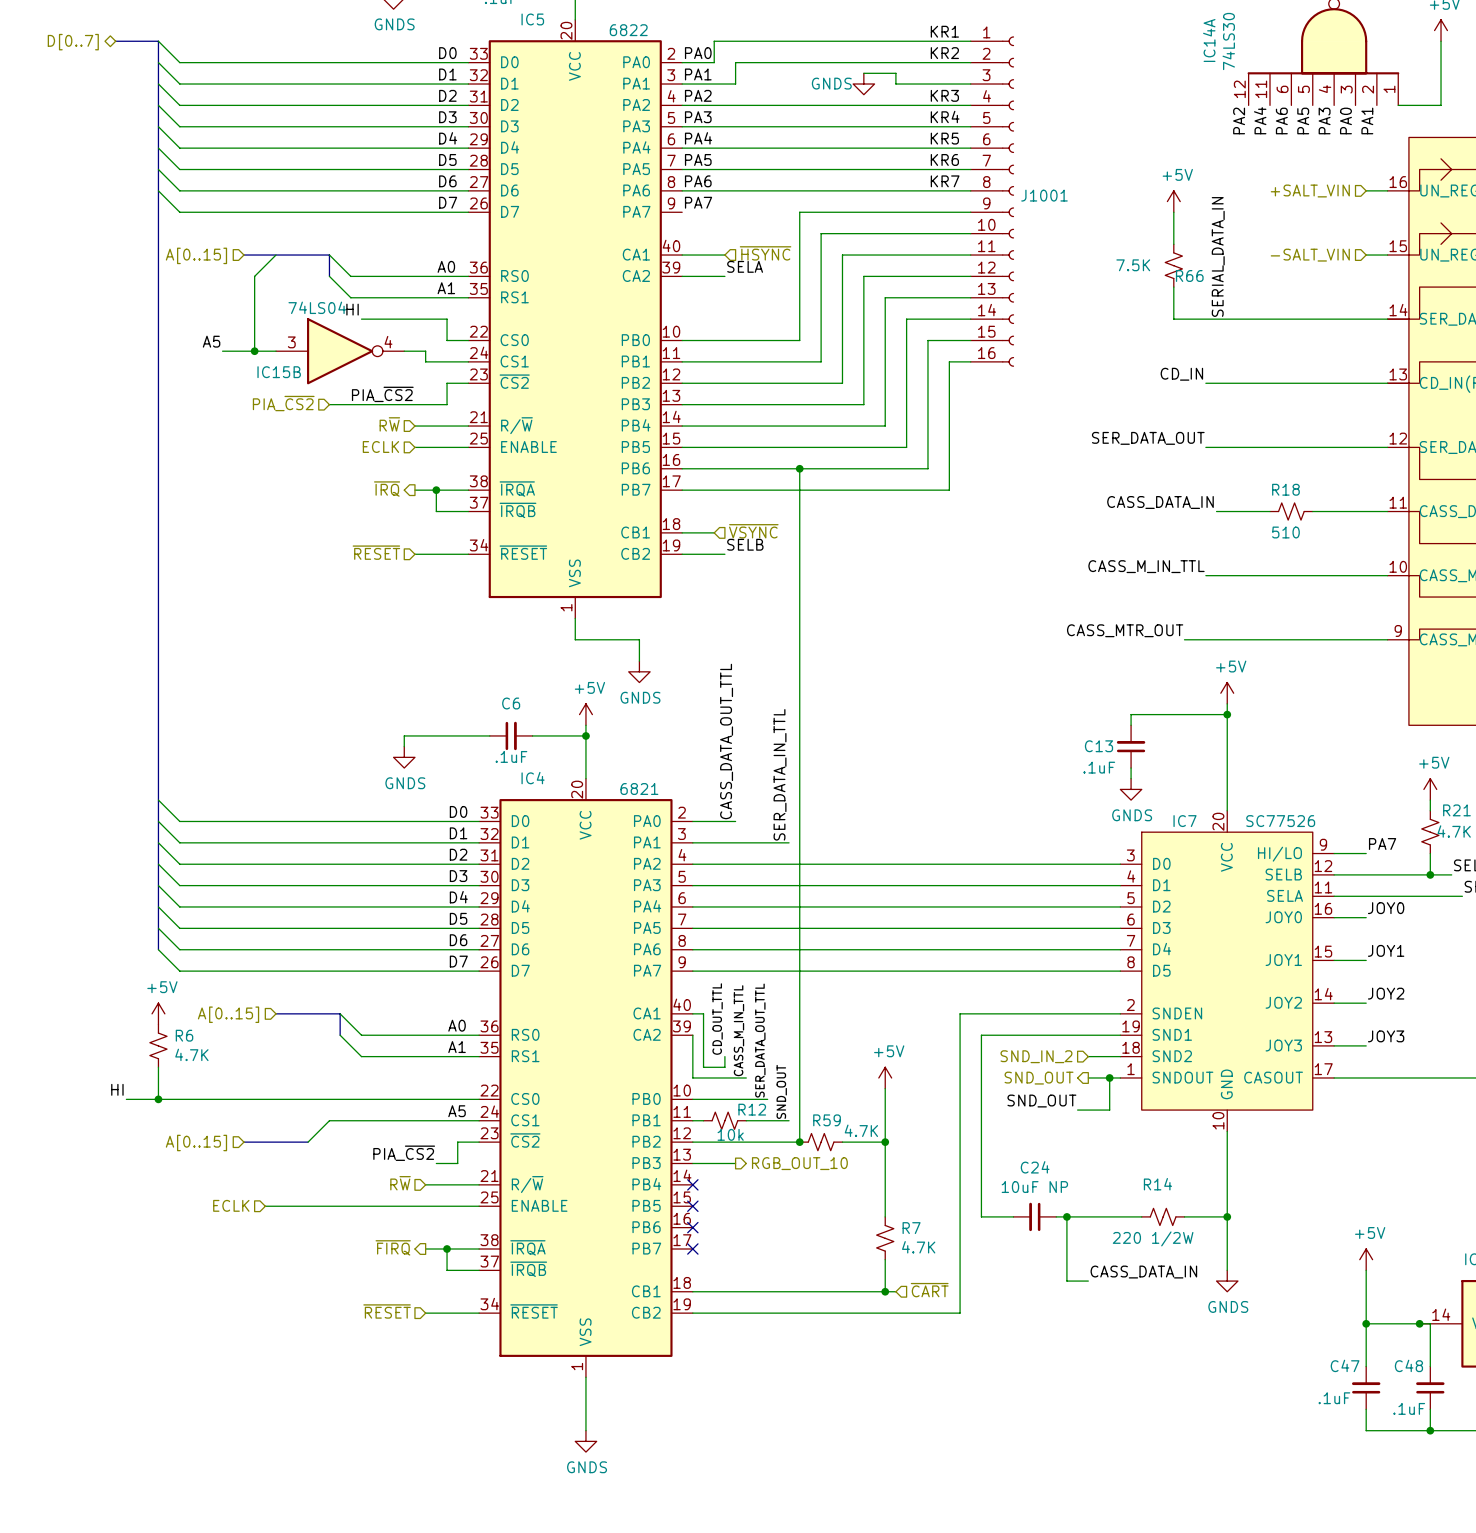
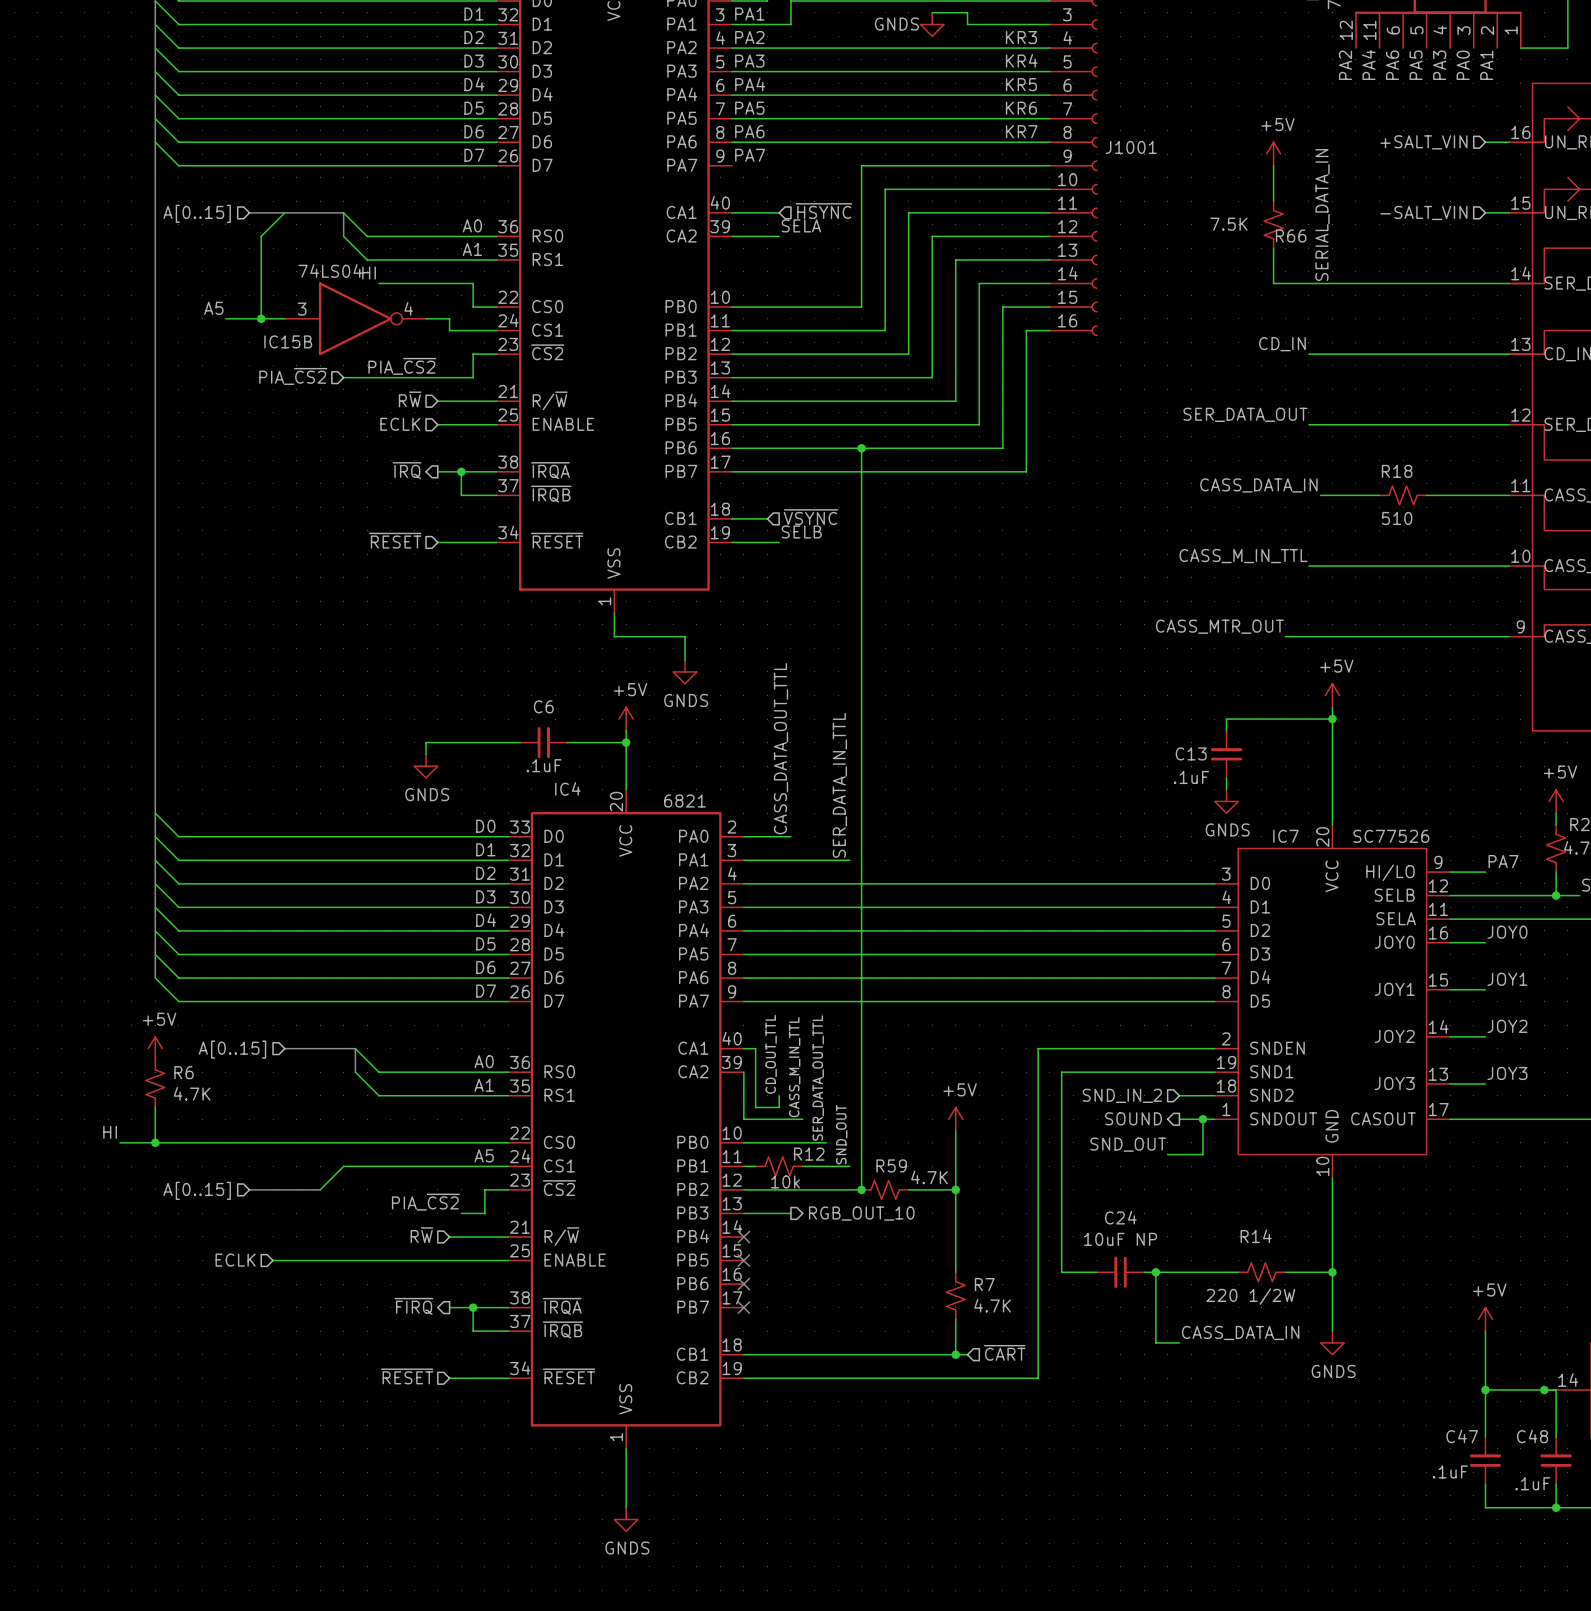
hierarchical label: SND_OUT (1039, 1078) -> SOUND (1133, 1118)

